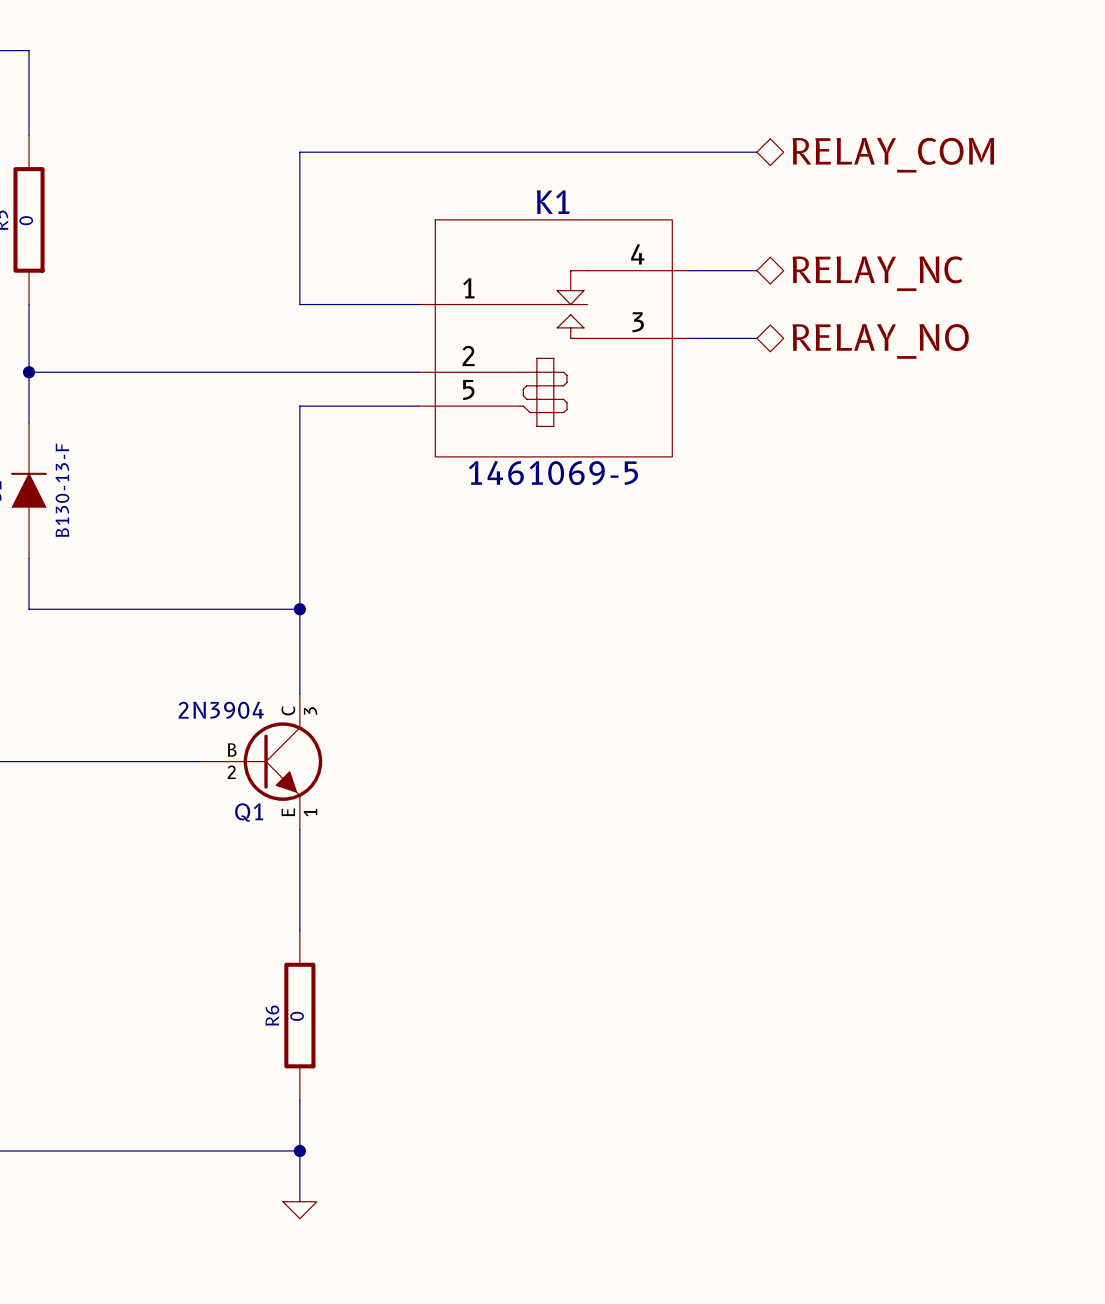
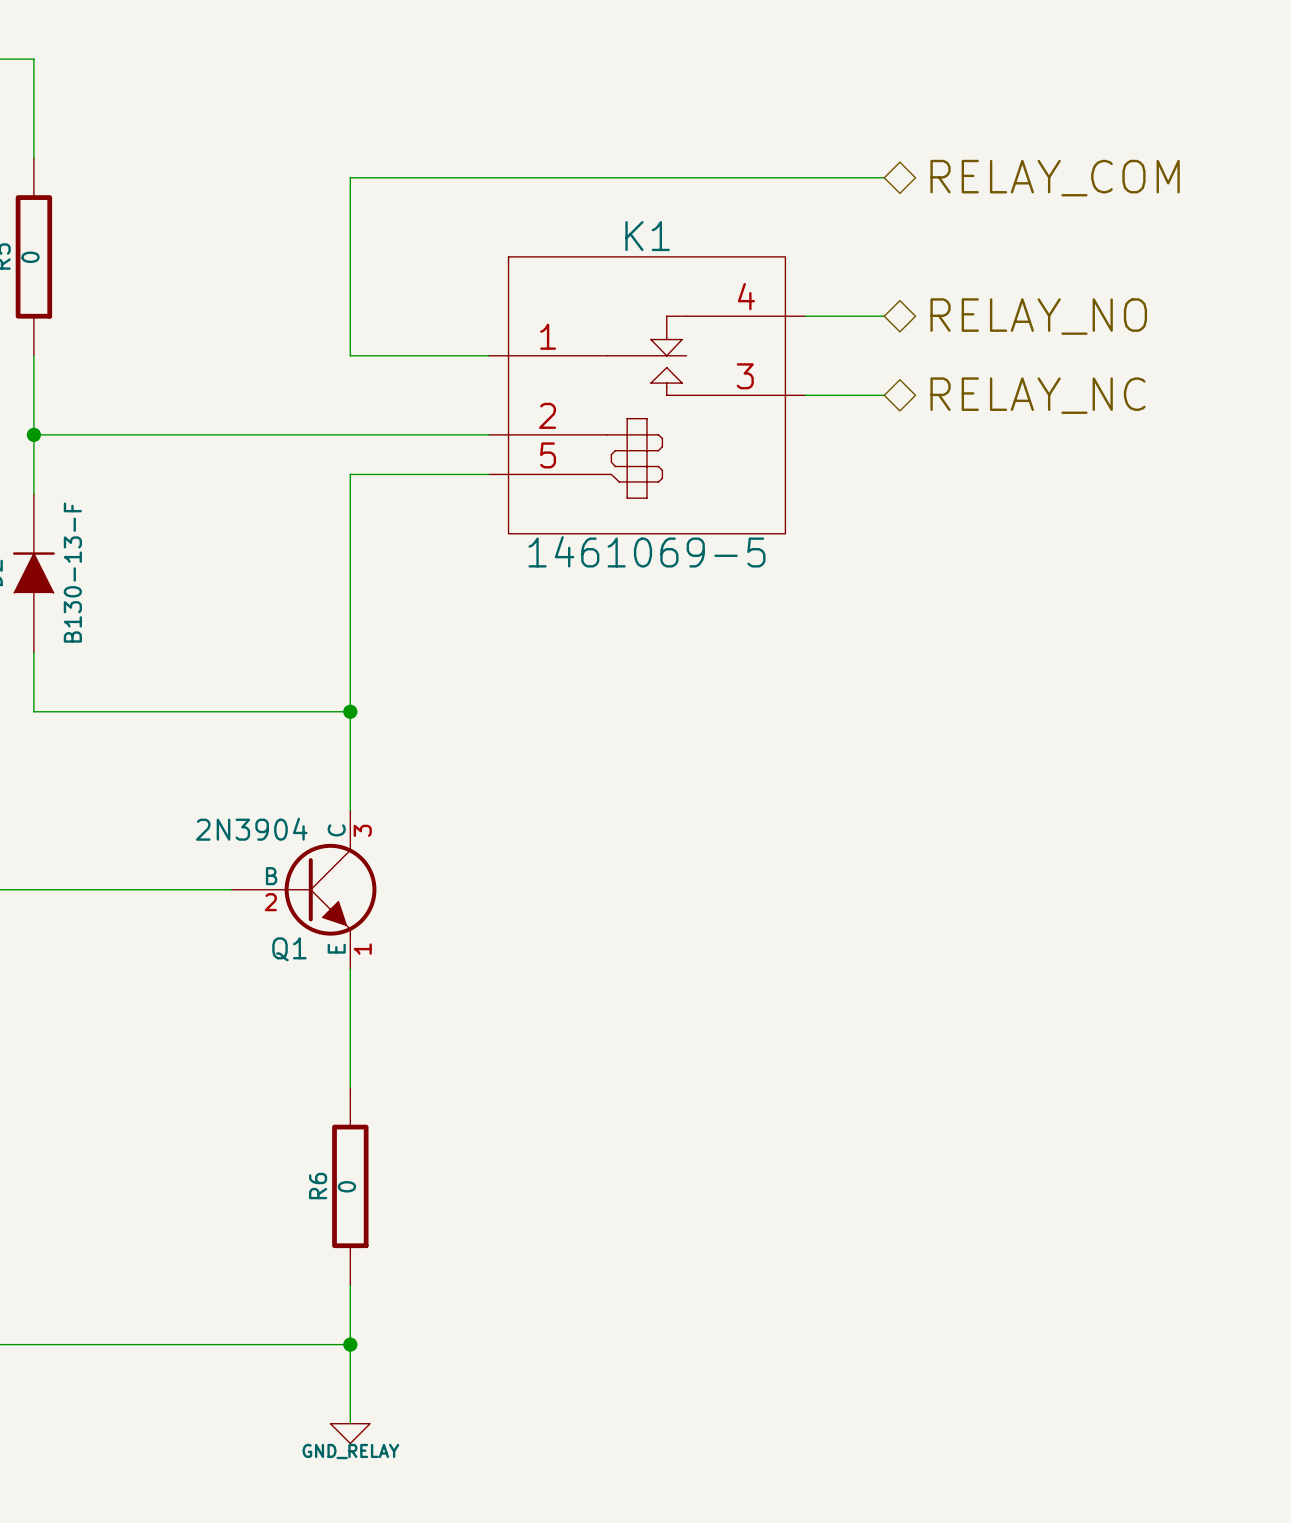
hierarchical label: RELAY_NC (877, 273) -> RELAY_NO (1038, 316)
hierarchical label: RELAY_NO (880, 341) -> RELAY_NC (1037, 395)
wire: none -> (350, 1403) (350, 1423)
power symbol: (299, 1210) -> none
power symbol: none -> GND_RELAY (350, 1433)

